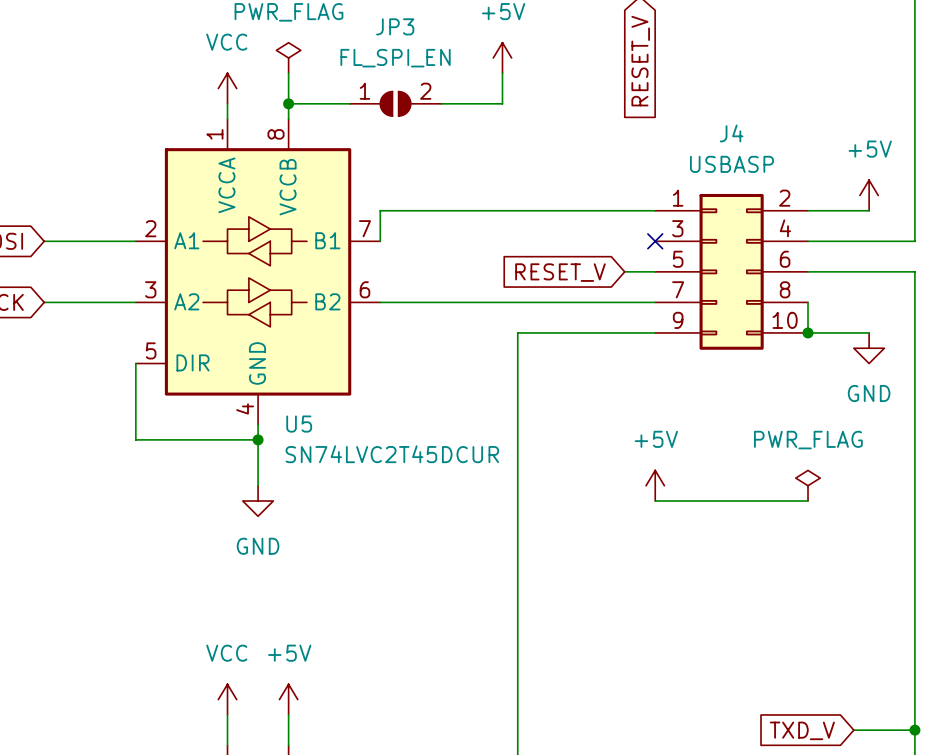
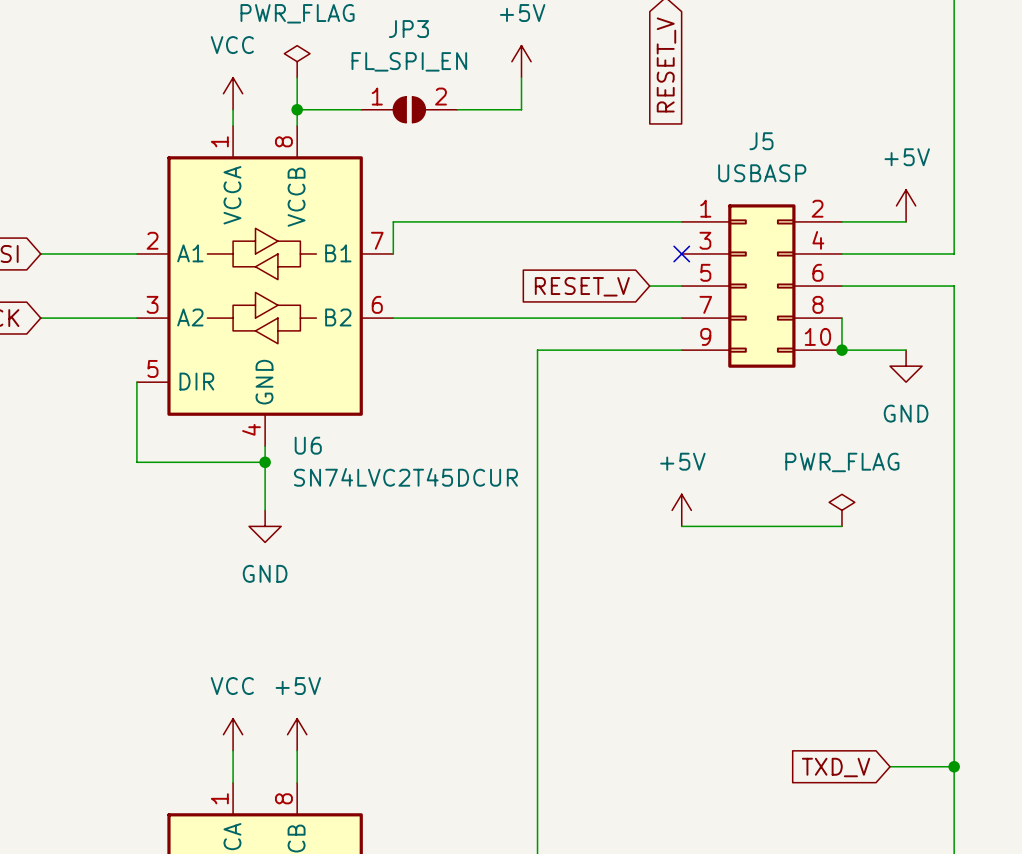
J4 name: J4 (731, 133) -> J5 (761, 141)
U5 name: U5 (299, 424) -> U6 (308, 445)

